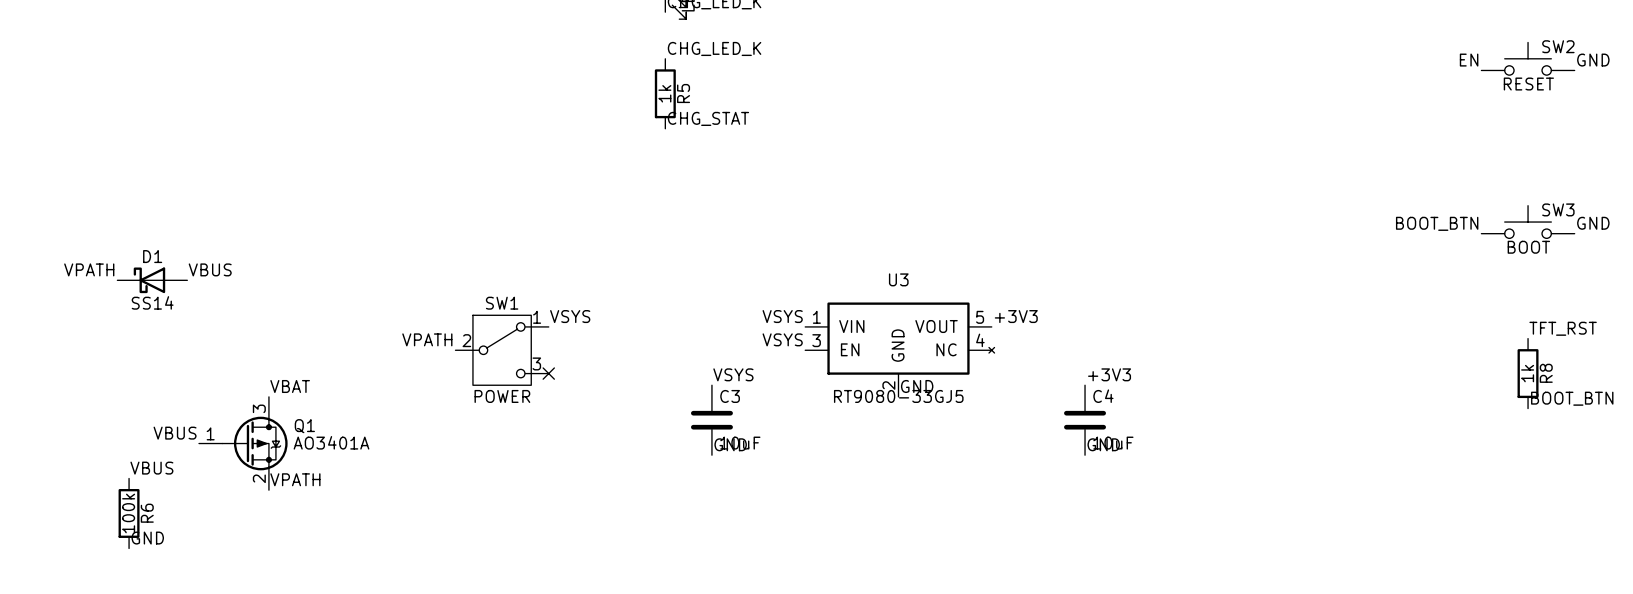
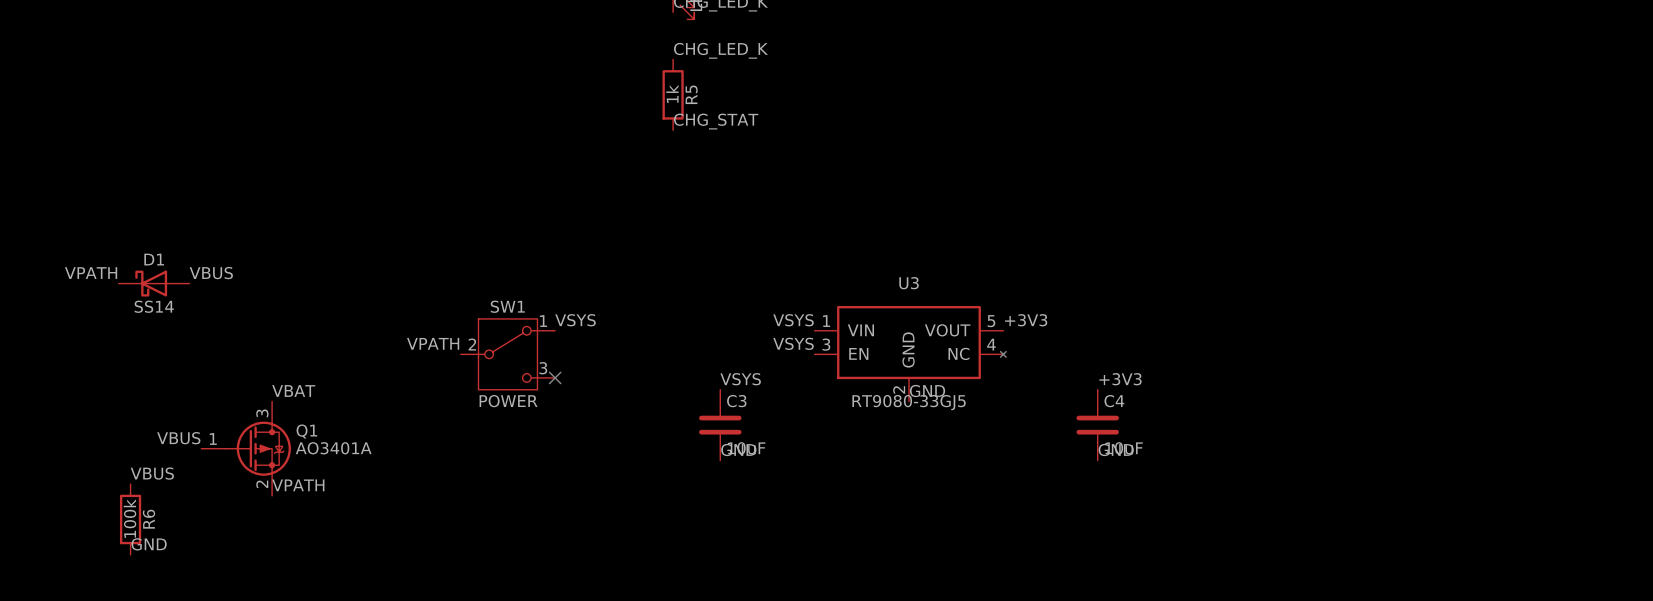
SW2: RESET (1528, 58) -> none
label: EN (1469, 60) -> none
label: GND (1593, 60) -> none
SW3: BOOT (1528, 222) -> none
label: BOOT_BTN (1437, 223) -> none
label: GND (1593, 223) -> none
label: TFT_RST (1563, 328) -> none
R8: 1k (1528, 373) -> none
label: BOOT_BTN (1572, 398) -> none

